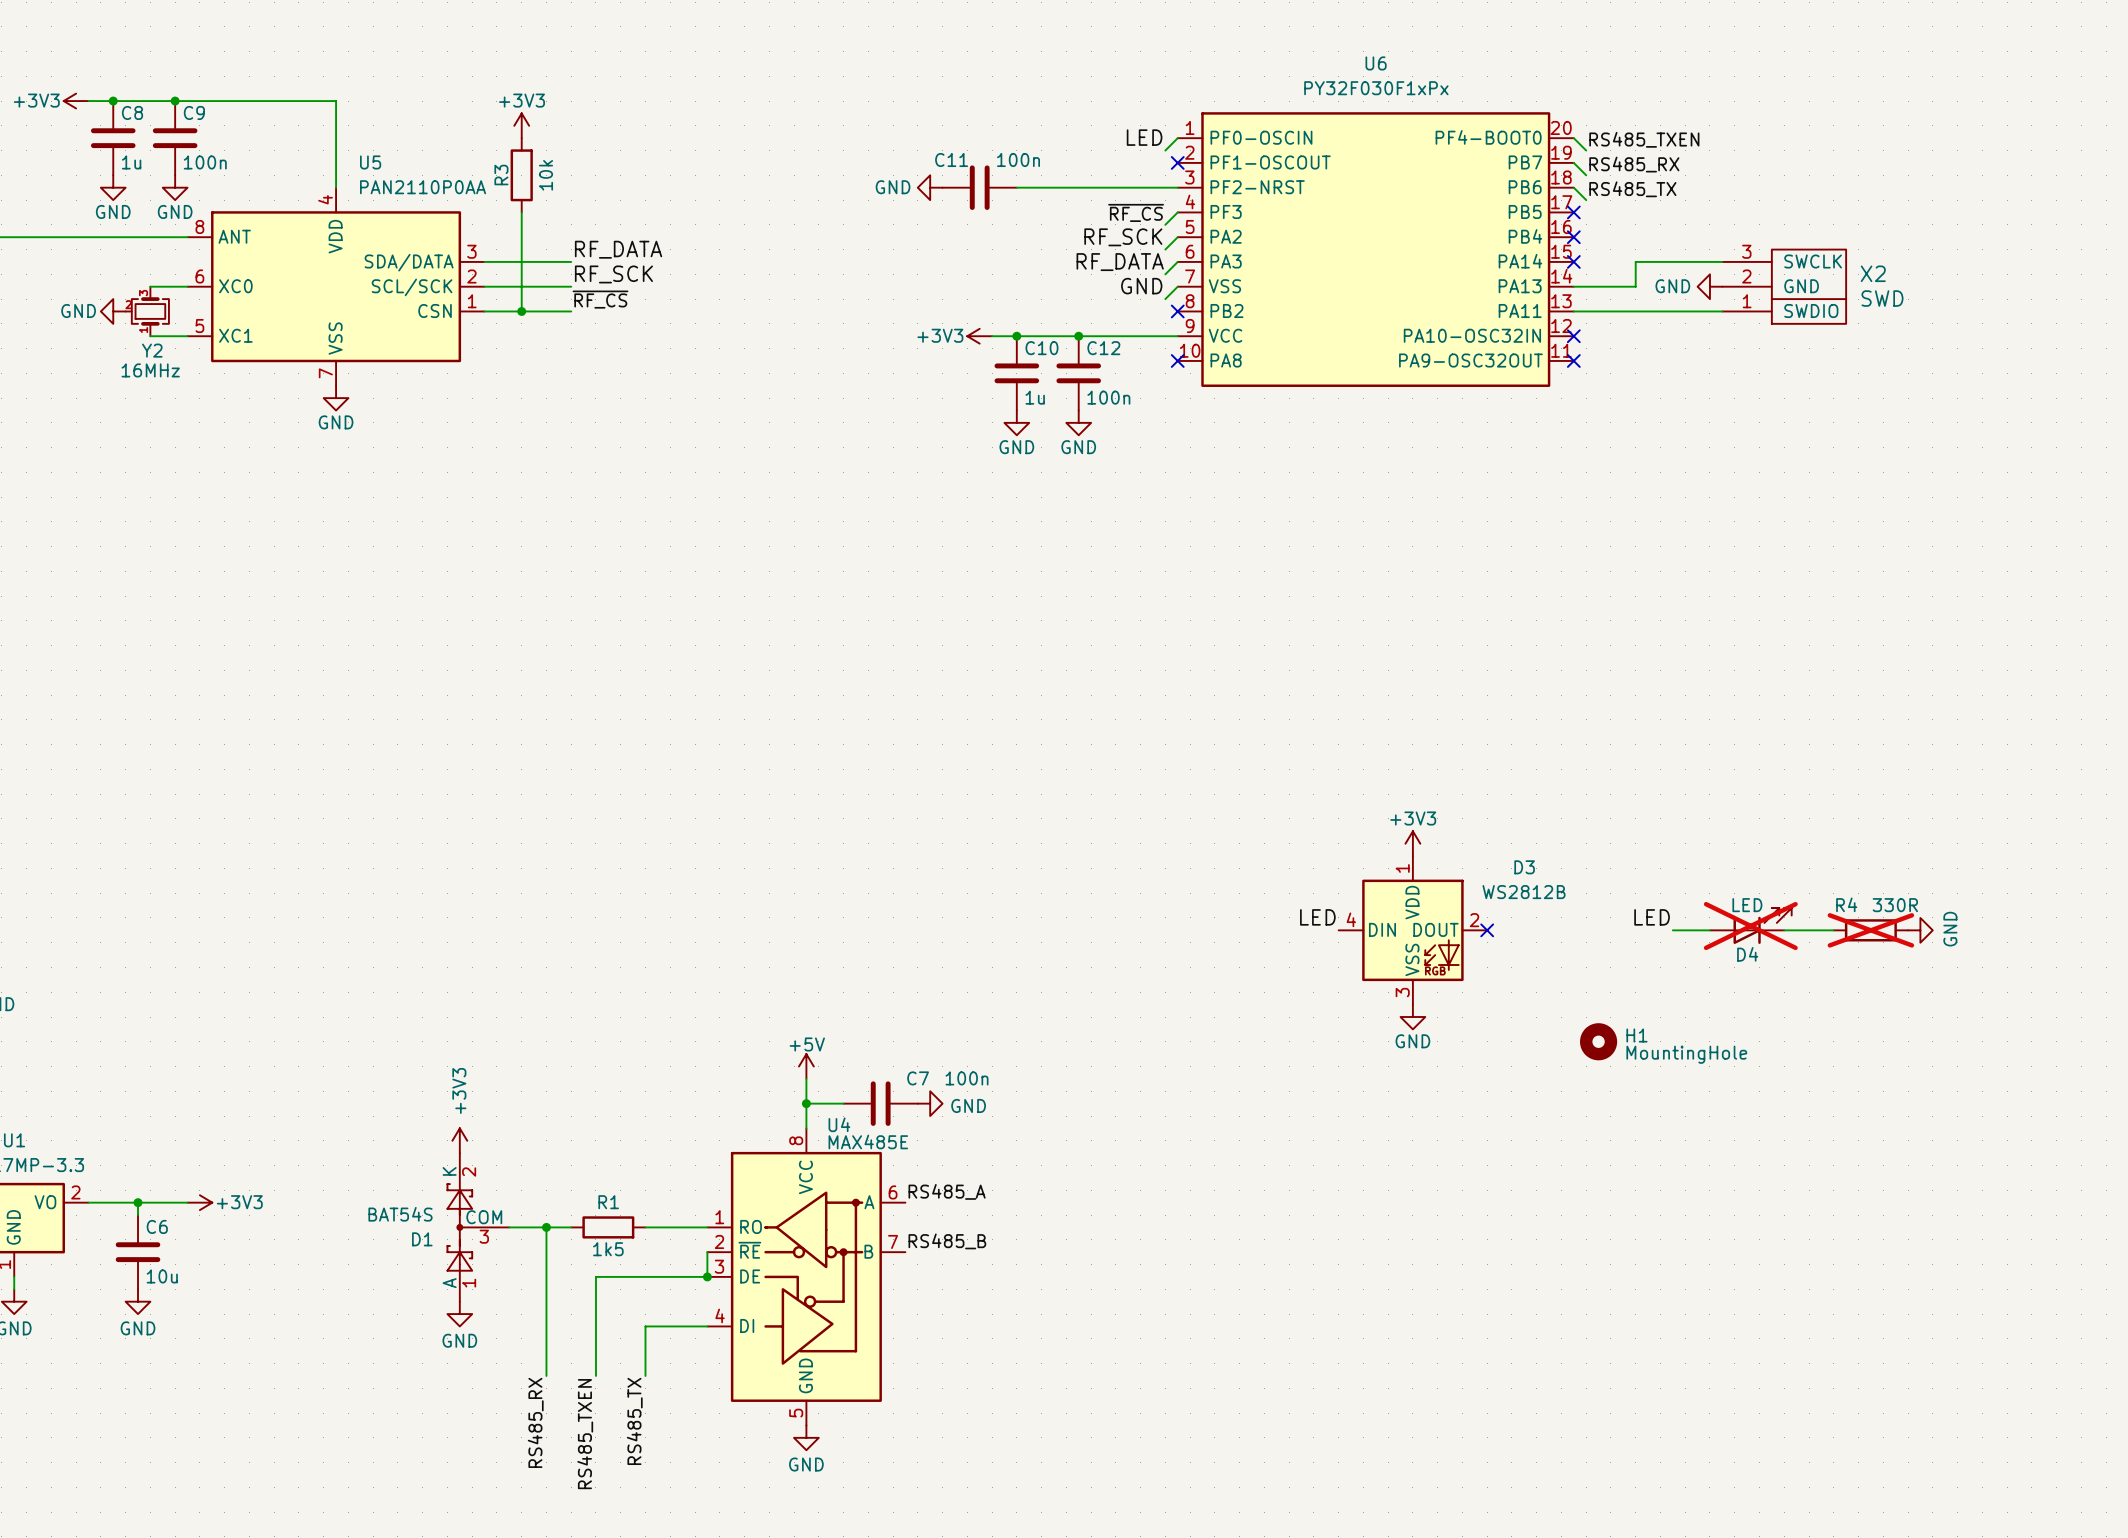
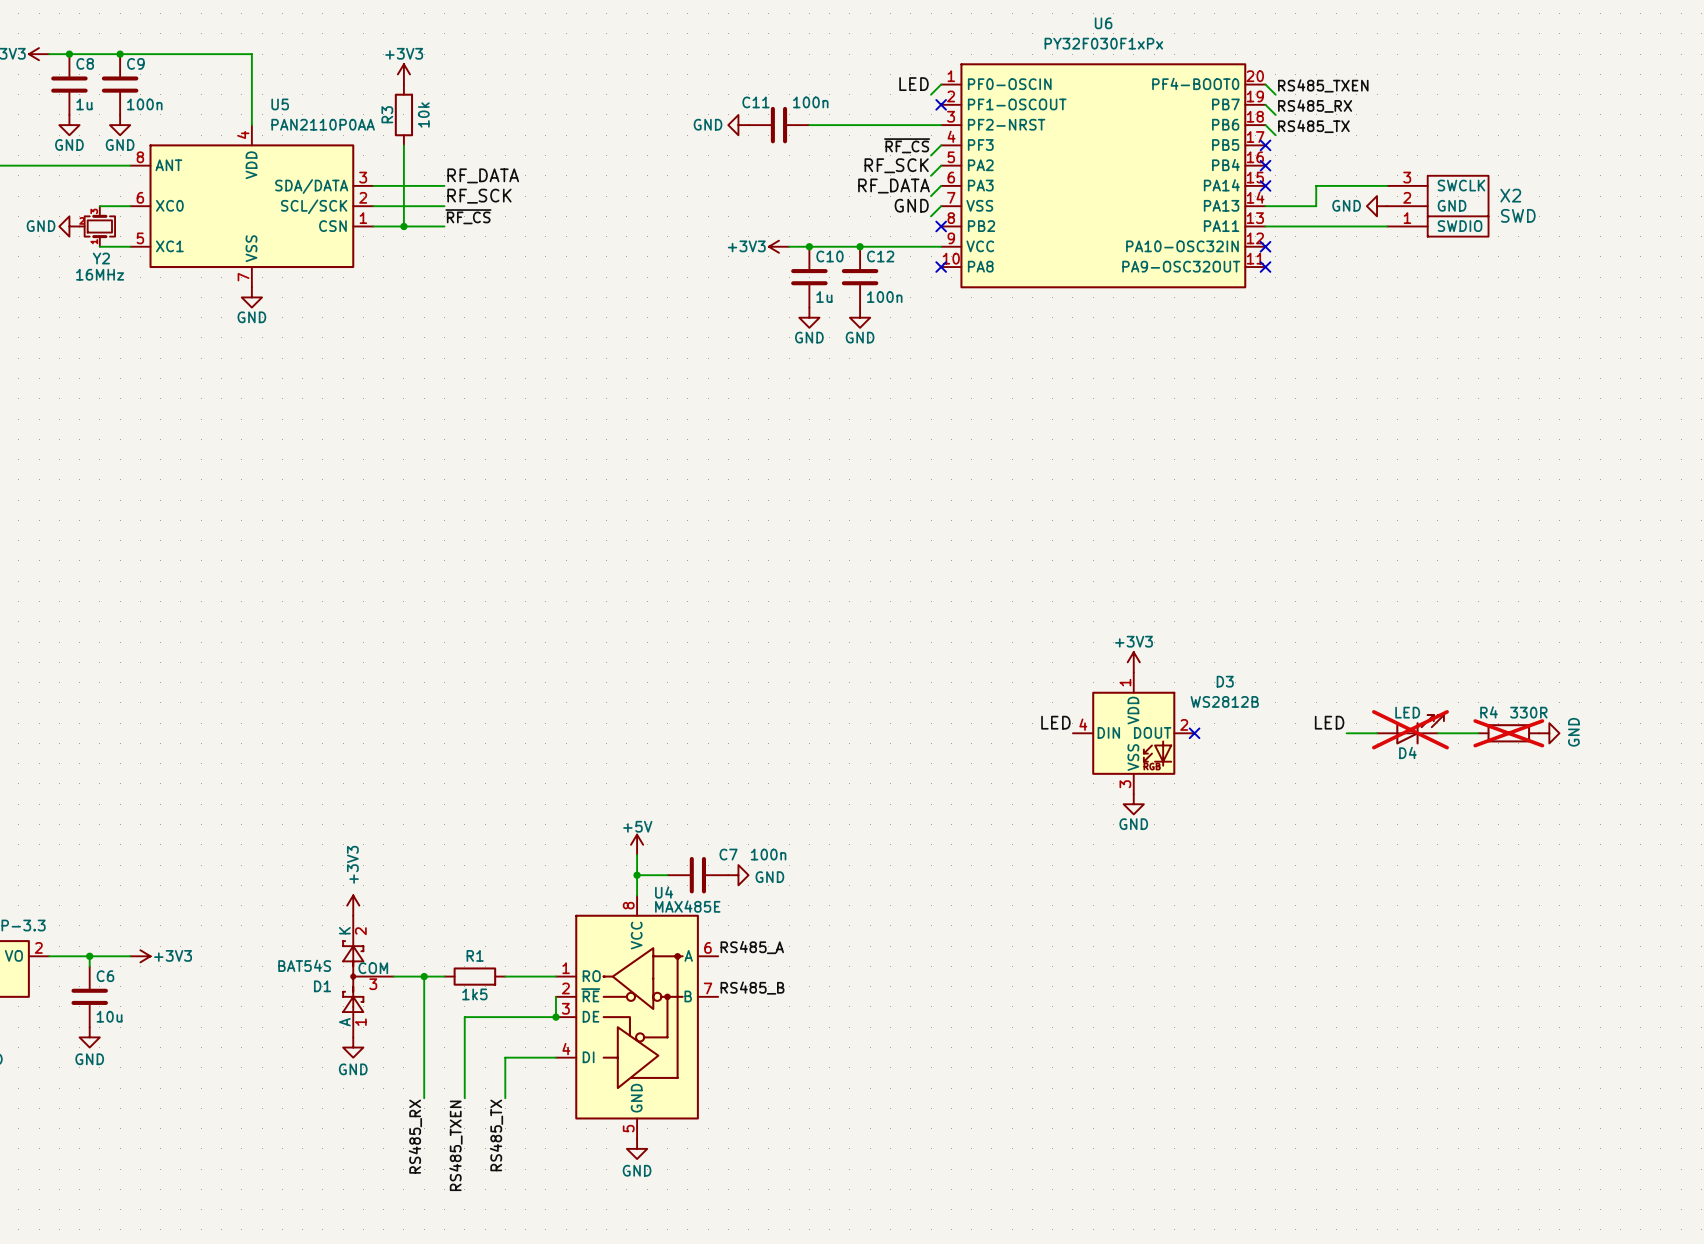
H1: MountingHole (1598, 1041) -> none

